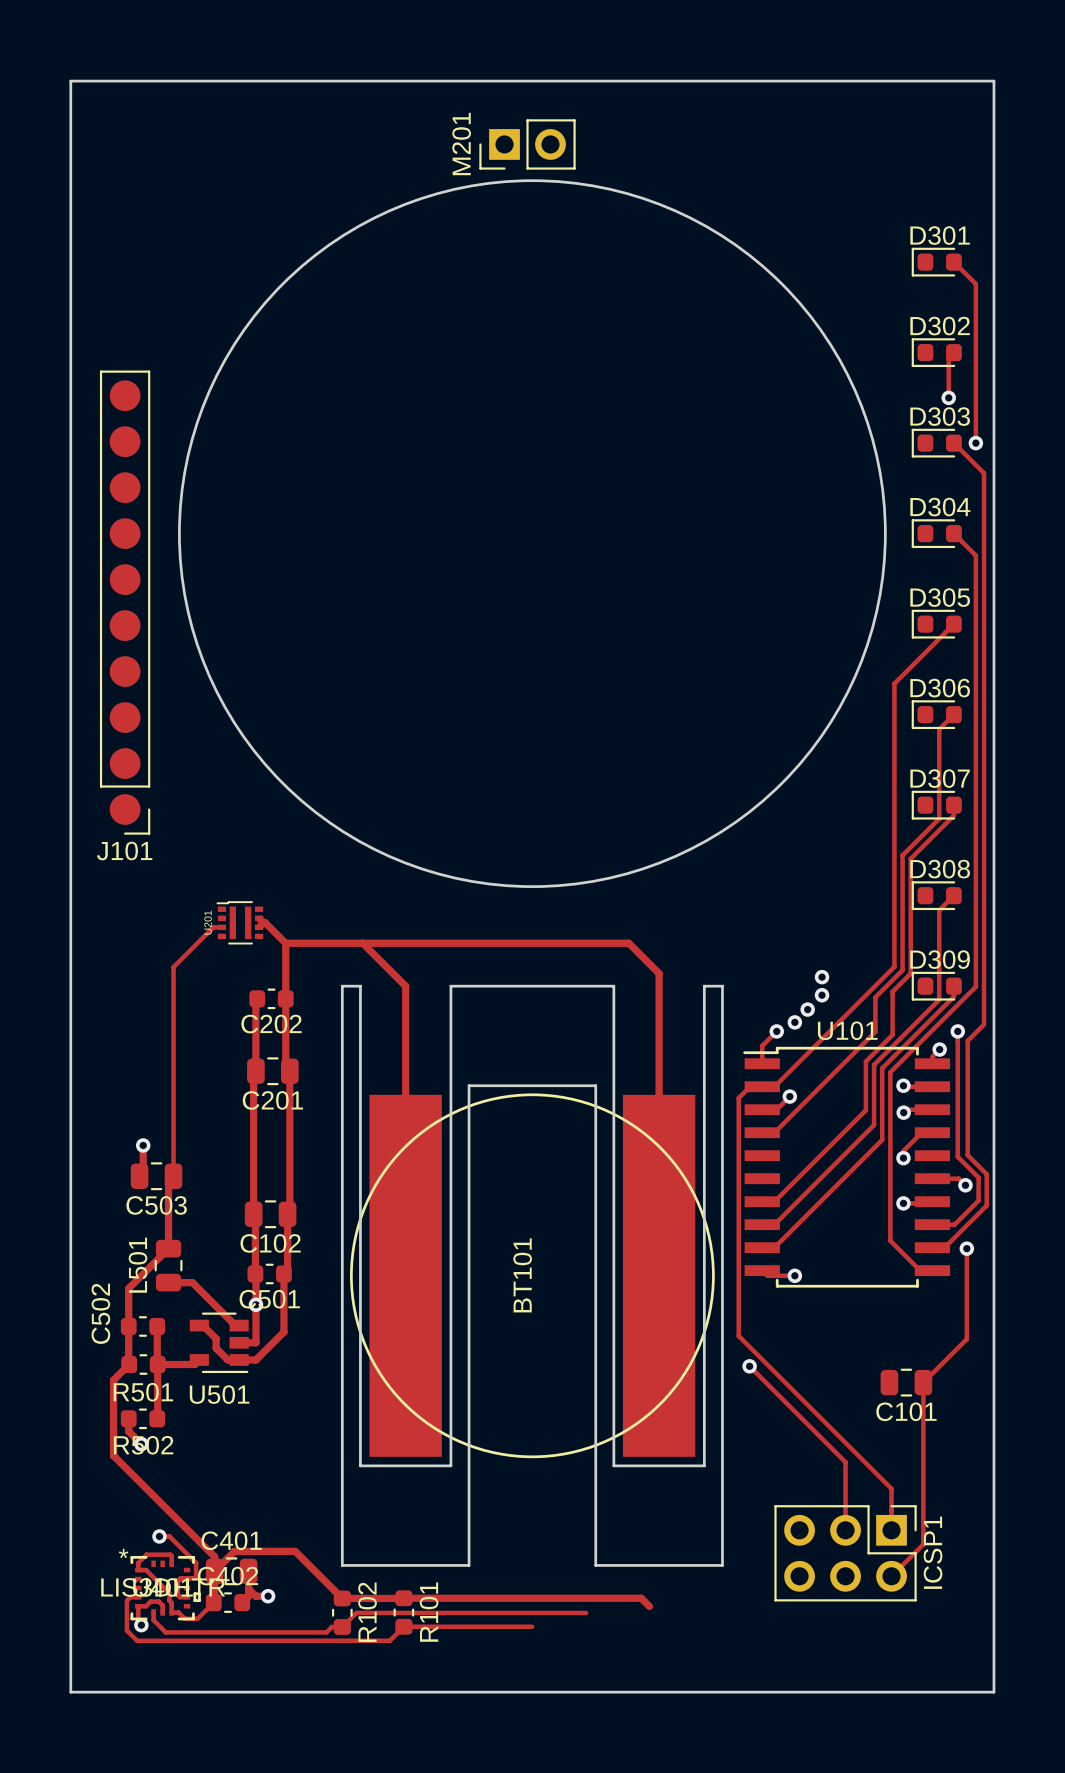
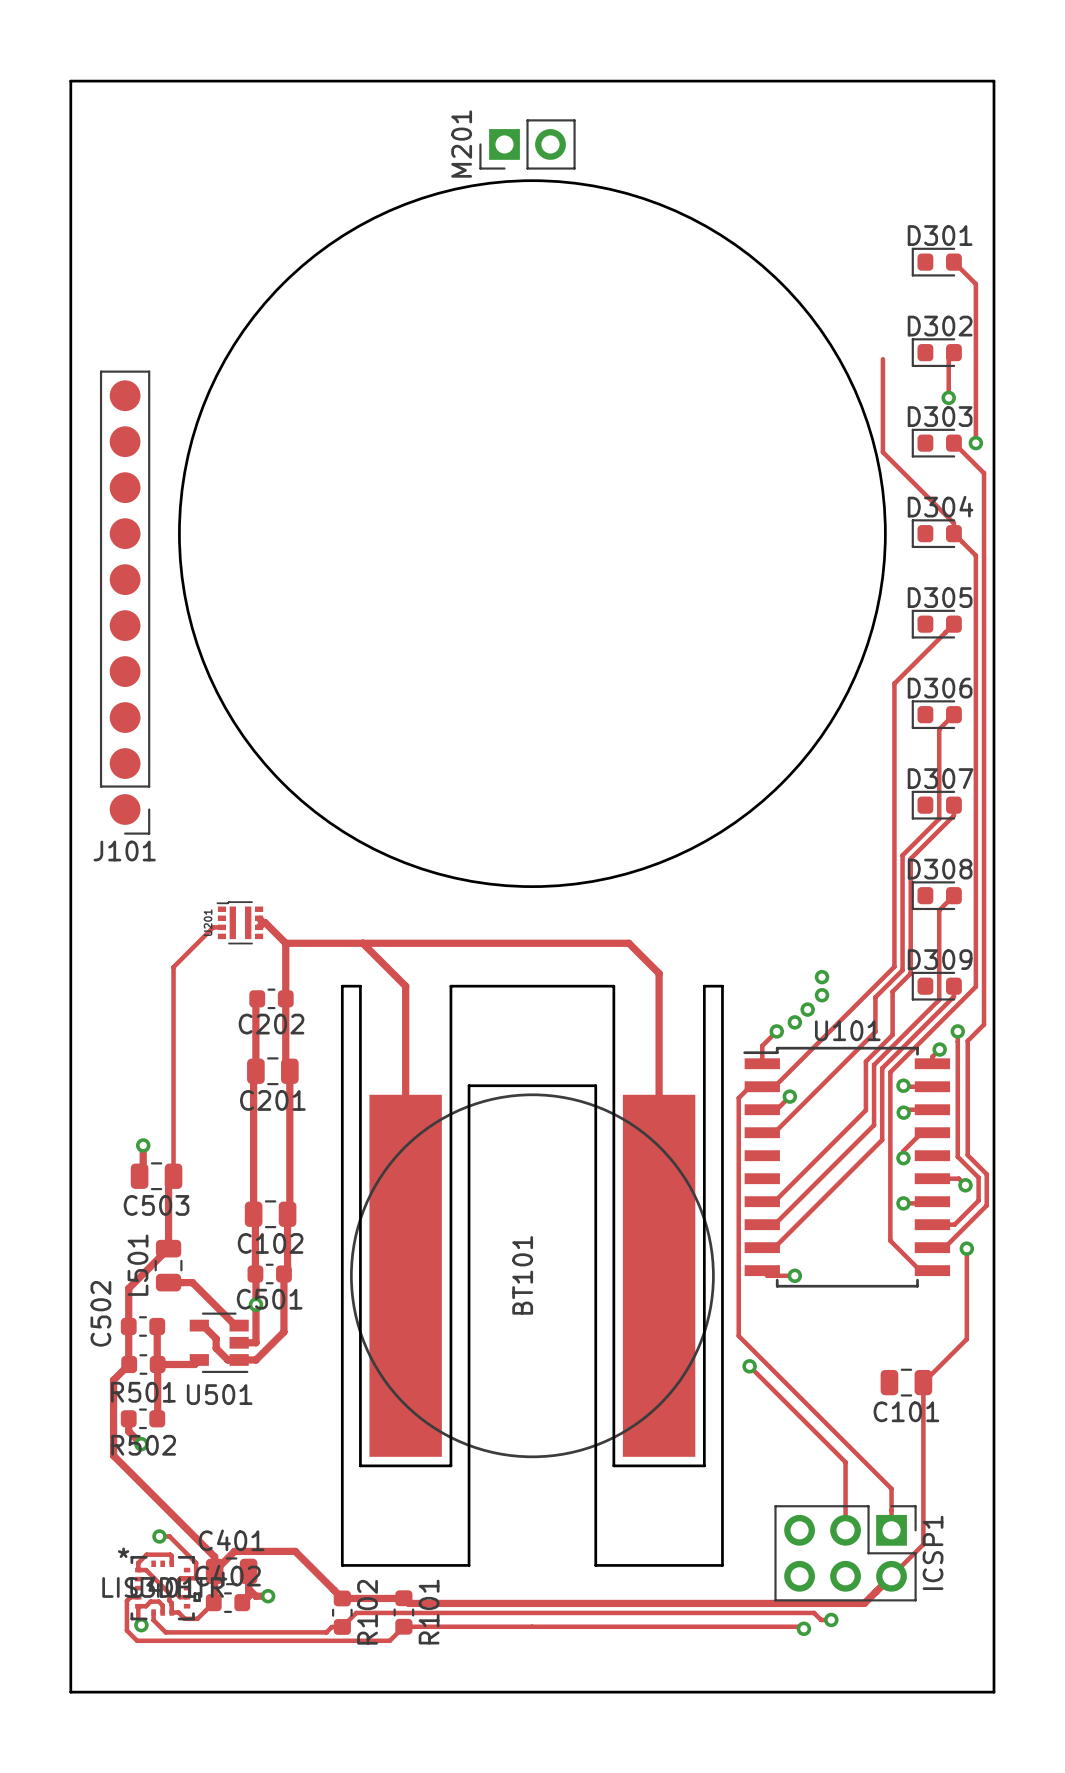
track: none -> (882, 359) (882, 452) (953, 523) (953, 533)
track: (403, 1598) (641, 1598) (649, 1606) -> (403, 1598) (409, 1603) (864, 1603) (891, 1576)
track: none -> (586, 1612) (814, 1612) (821, 1619) (831, 1619)
via: none -> (831, 1619)
track: none -> (532, 1626) (801, 1626) (803, 1628)
via: none -> (803, 1628)

